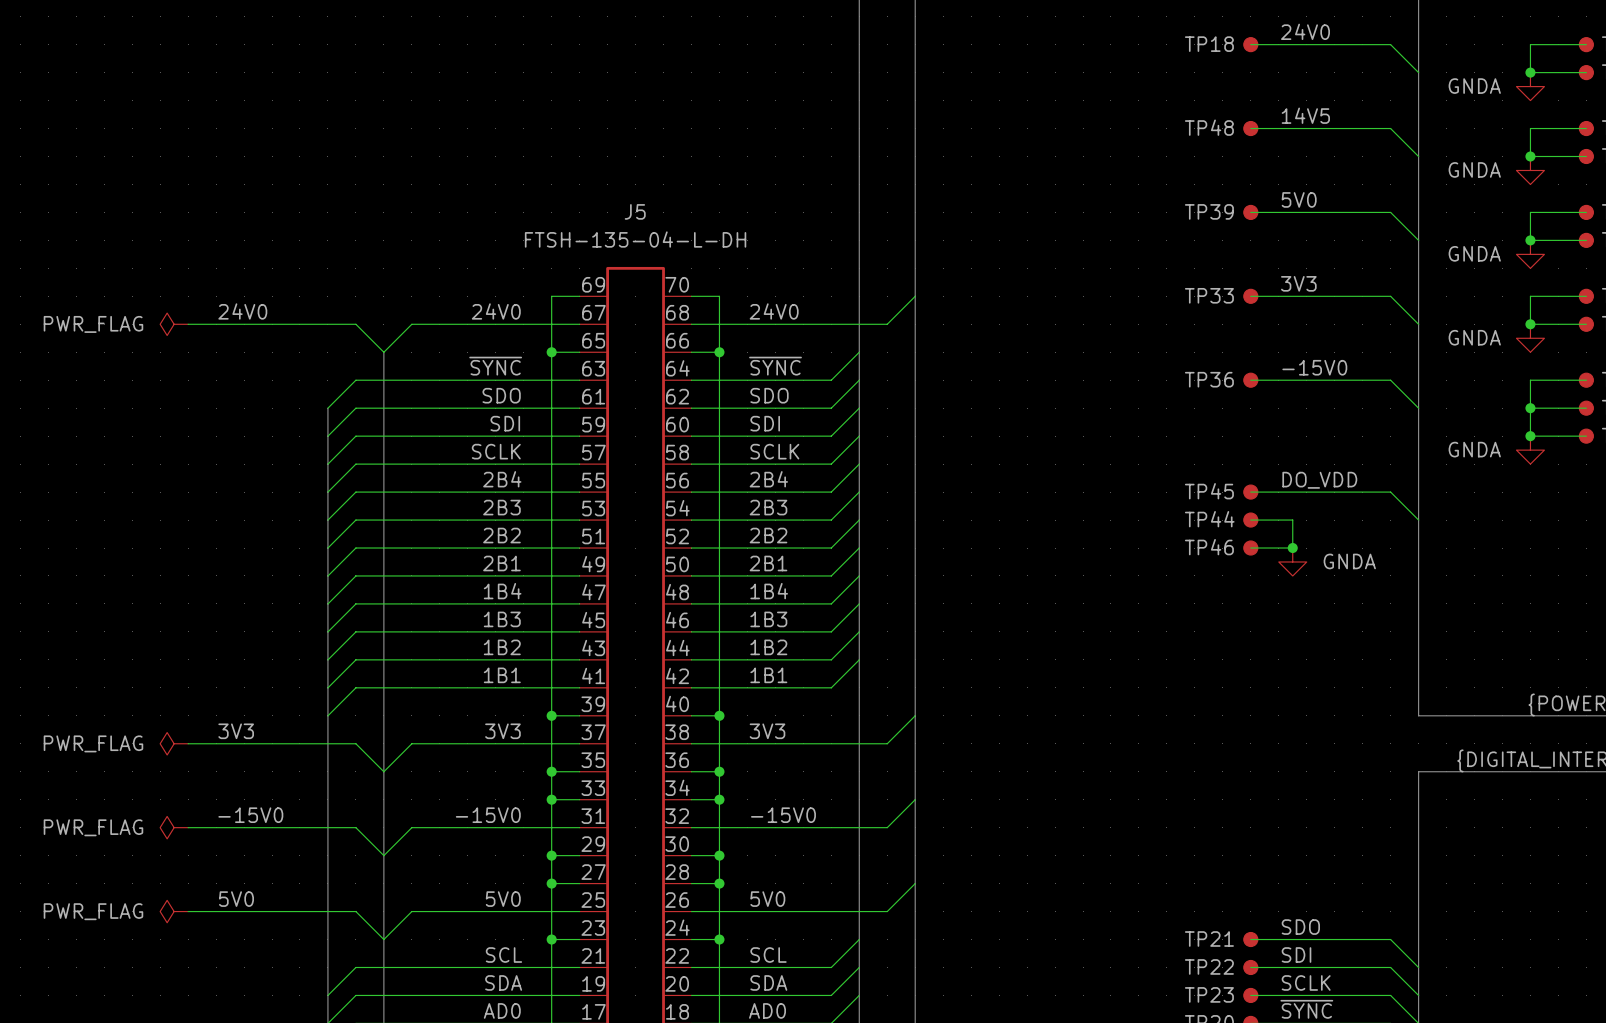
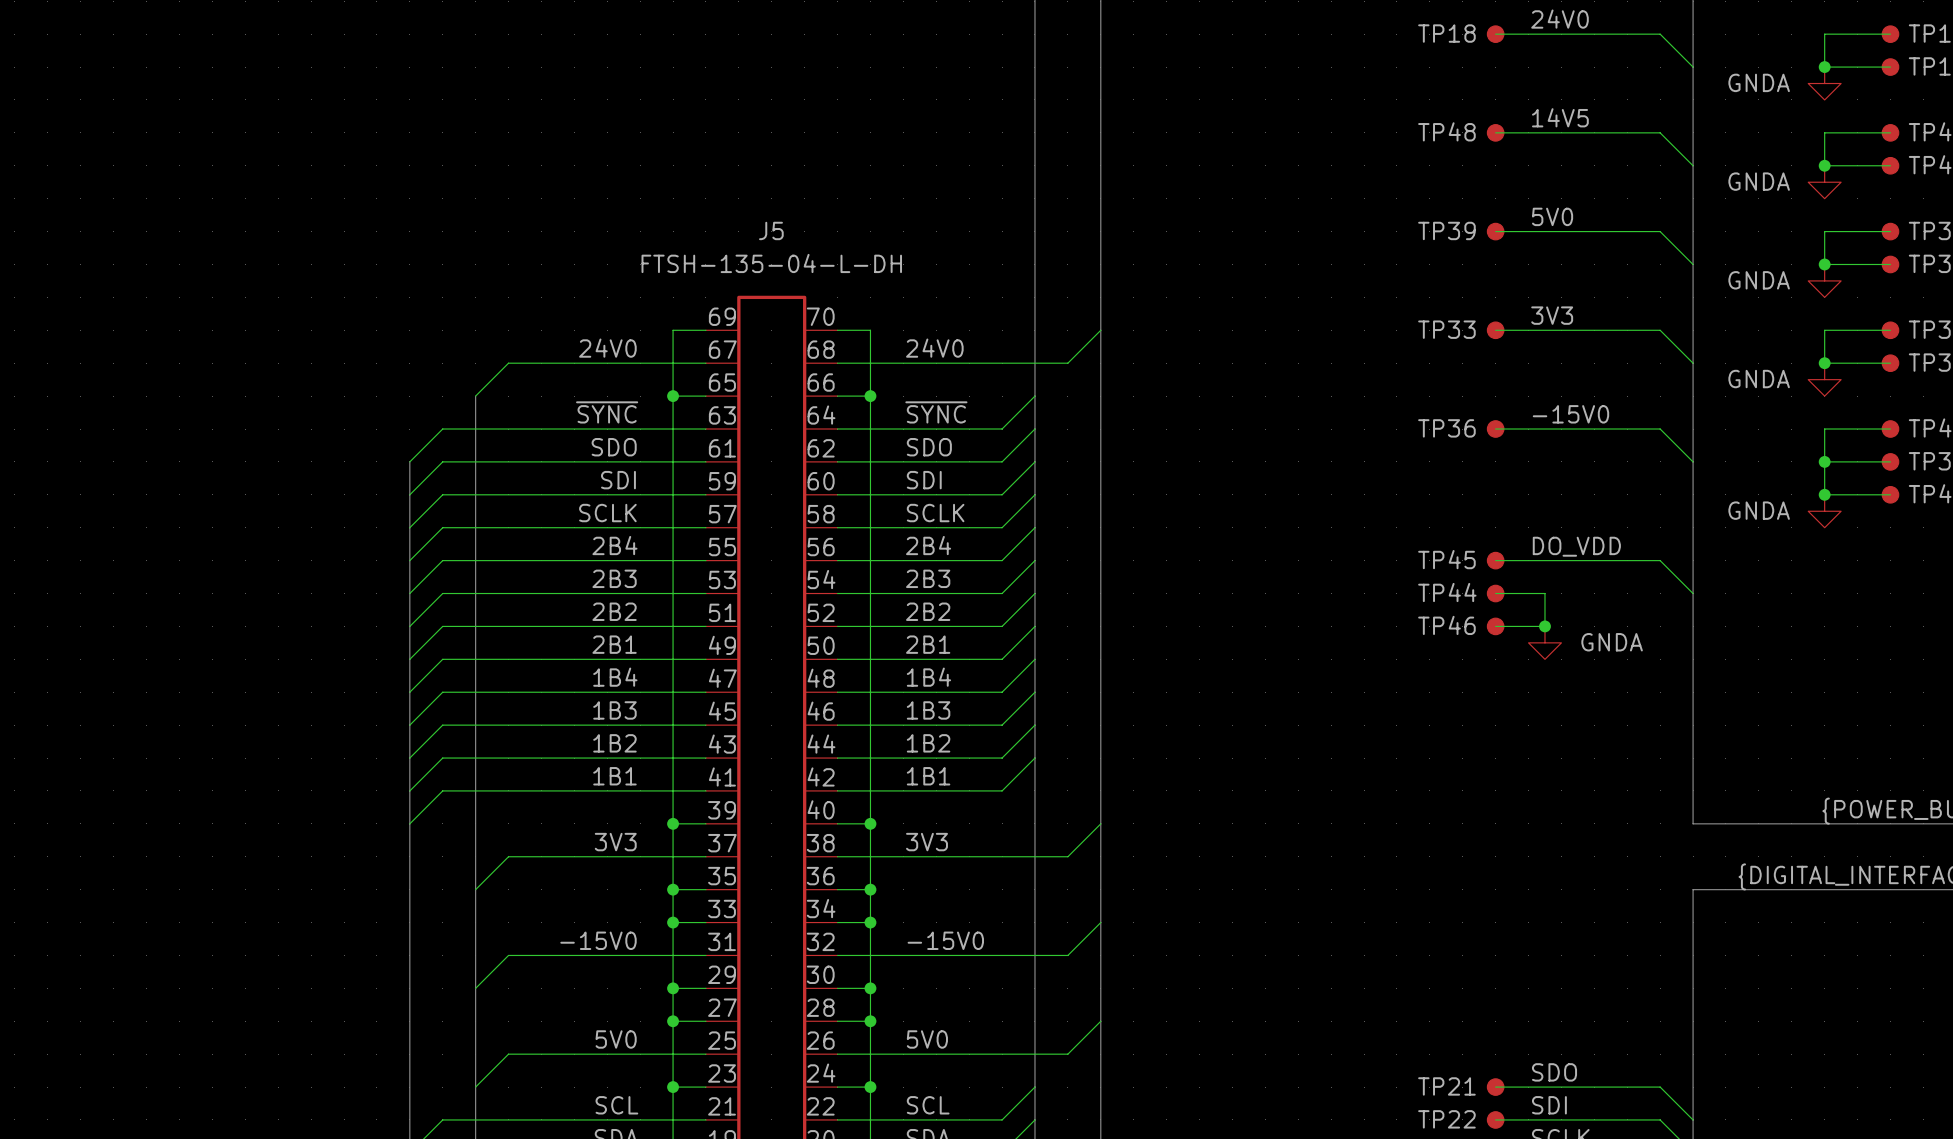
label: 24V0 (242, 311) -> none
power symbol: PWR_FLAG (174, 324) -> none
wire: (188, 324) (355, 324) (383, 352) -> none
label: 3V3 (236, 731) -> none
power symbol: PWR_FLAG (174, 743) -> none
wire: (188, 743) (355, 743) (383, 771) -> none
label: -15V0 (250, 815) -> none
power symbol: PWR_FLAG (174, 827) -> none
wire: (188, 827) (355, 827) (383, 855) -> none
label: 5V0 (236, 899) -> none
power symbol: PWR_FLAG (174, 911) -> none
wire: (188, 911) (355, 911) (383, 939) -> none

